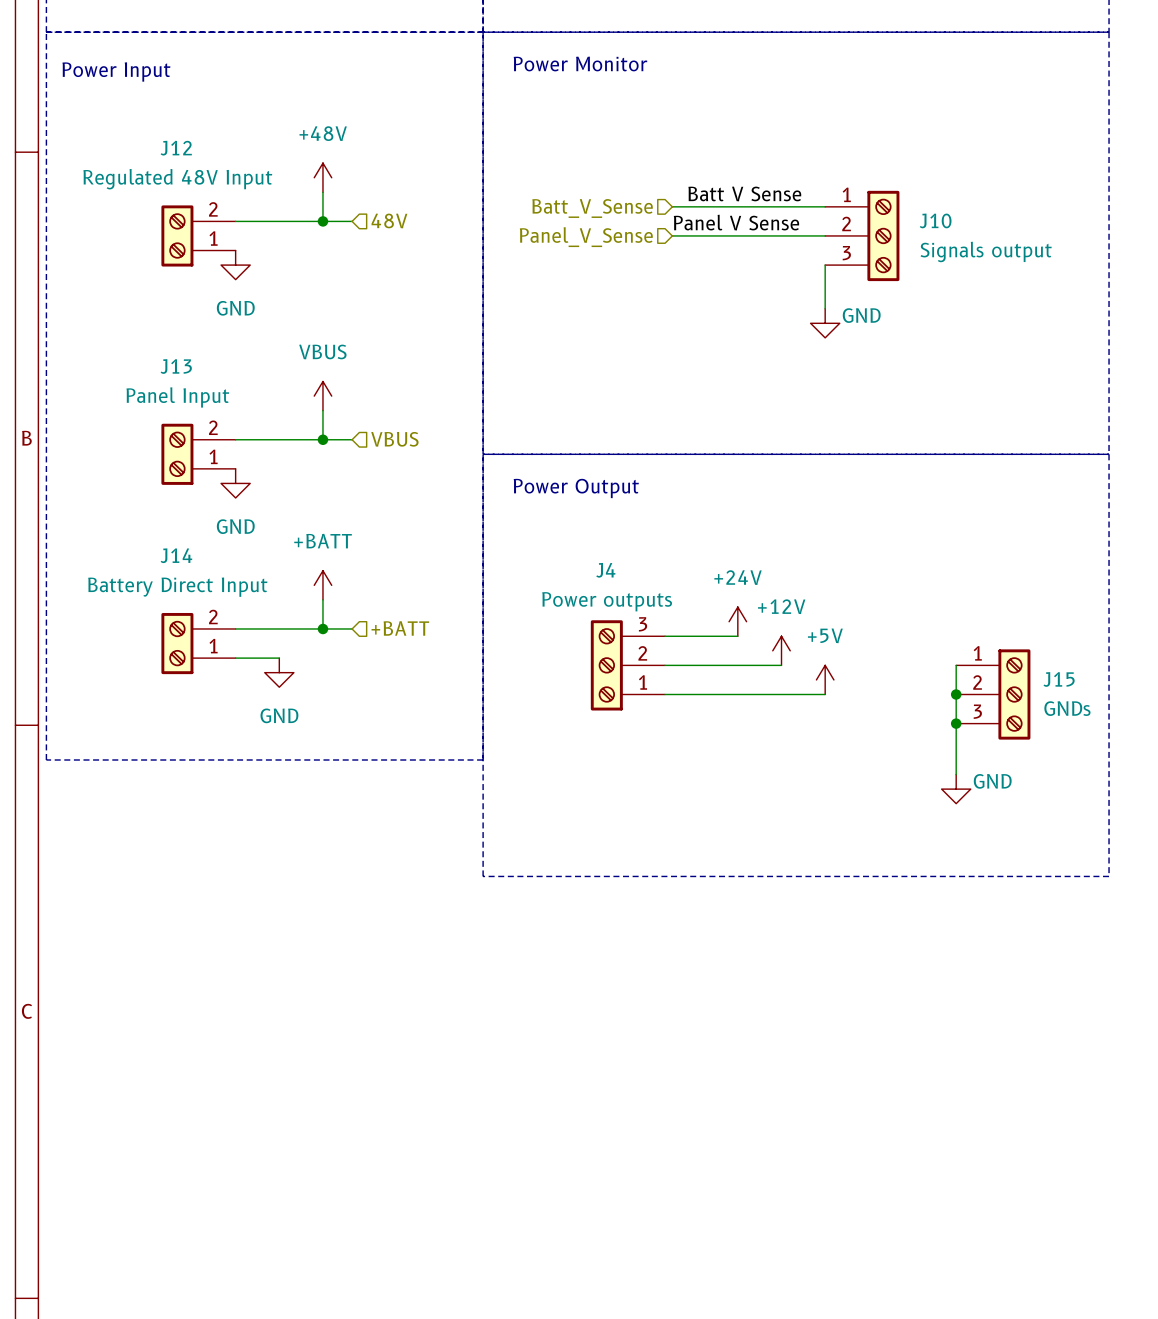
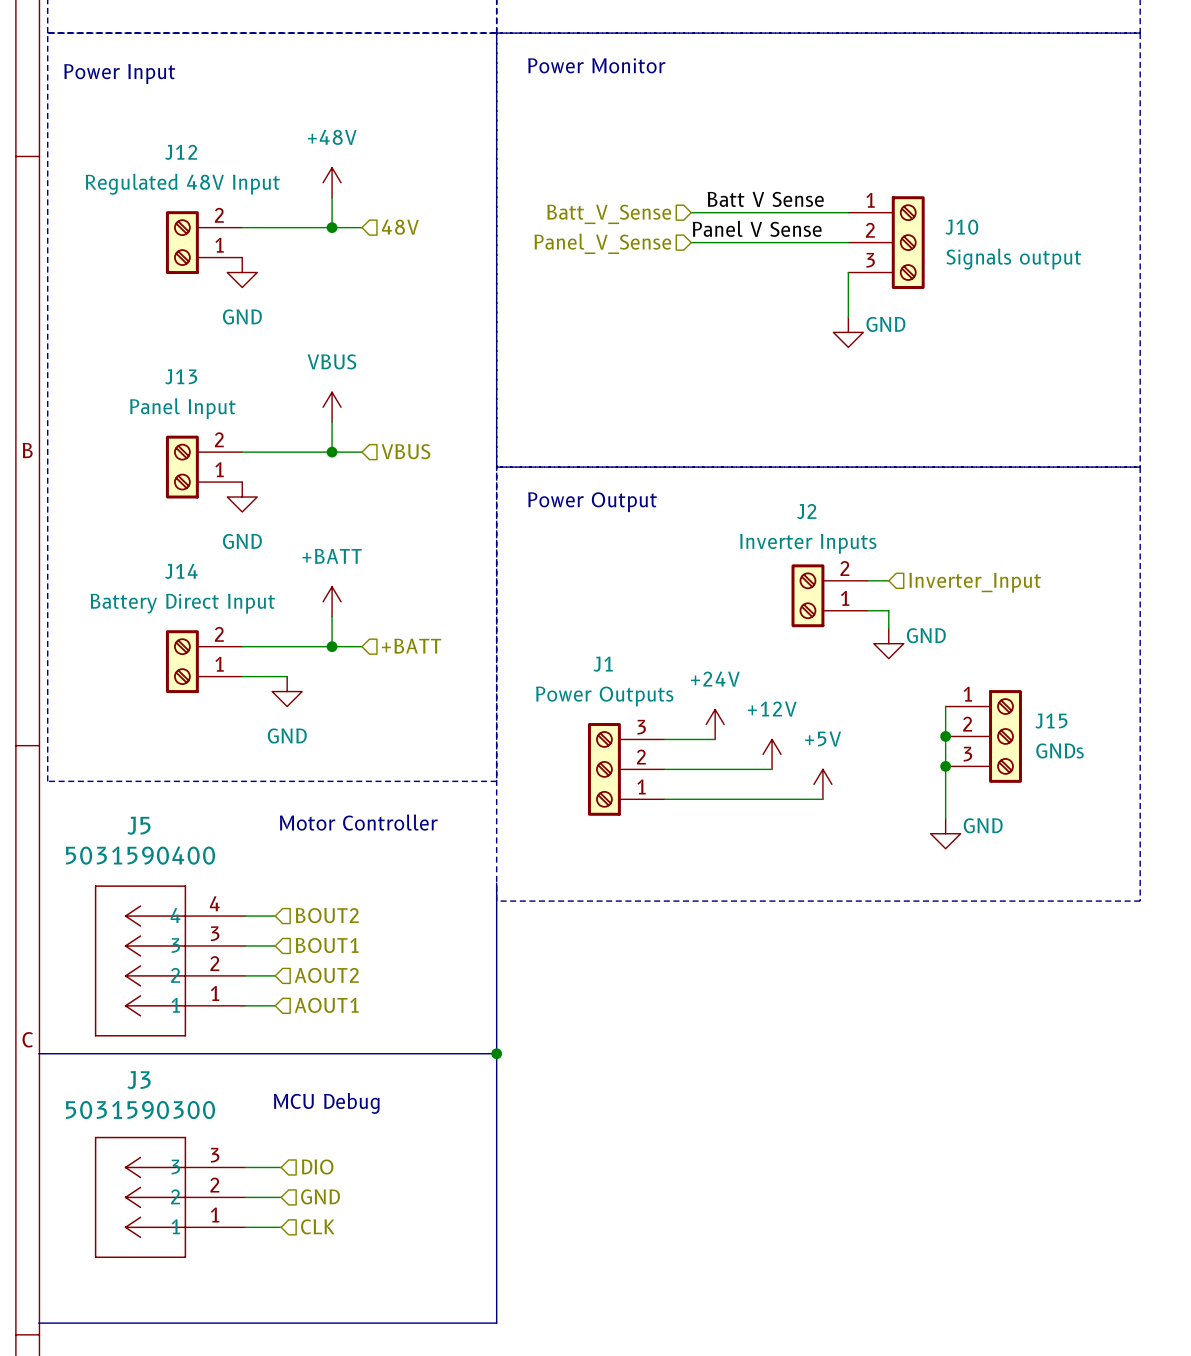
wire: none -> (867, 580) (888, 580)
hierarchical label: none -> Inverter_Input (975, 582)
J2: none -> Inverter Inputs (829, 595)
wire: none -> (867, 610) (888, 610) (888, 628)
power symbol position: +24V (737, 621) -> +24V (715, 724)
power symbol: none -> GND (888, 643)
wire: (665, 636) (737, 636) -> none
power symbol position: +12V (781, 650) -> +12V (772, 754)
J4: Power outputs (627, 665) -> none
wire: (665, 665) (781, 665) -> none
wire: (956, 665) (956, 774) -> (945, 706) (945, 818)
power symbol position: +5V (825, 679) -> +5V (822, 784)
wire: (665, 694) (825, 694) -> none
junction: (956, 694) -> none
J15 position: (993, 694) -> (983, 736)
junction: none -> (945, 736)
wire: none -> (664, 739) (715, 739)
junction: (956, 723) -> none
junction: none -> (945, 766)
J1: none -> Power Outputs (626, 769)
wire: none -> (664, 769) (772, 769)
wire: none -> (664, 799) (822, 799)
power symbol position: GND (956, 789) -> GND (945, 833)
text: none -> Motor Controller (358, 822)
bus: none -> (496, 883) (496, 1323) (38, 1323)
hierarchical label: none -> BOUT2 (327, 915)
wire: none -> (245, 916) (275, 916)
hierarchical label: none -> BOUT1 (327, 945)
wire: none -> (245, 945) (275, 945)
J5: none -> 5031590400 (170, 960)
hierarchical label: none -> AOUT2 (326, 975)
wire: none -> (245, 975) (275, 975)
hierarchical label: none -> AOUT1 (326, 1005)
wire: none -> (245, 1005) (275, 1005)
bus: none -> (38, 1053) (496, 1053)
junction: none -> (496, 1053)
text: none -> MCU Debug (326, 1103)
wire: none -> (245, 1167) (281, 1167)
hierarchical label: none -> DIO (317, 1166)
J3: none -> 5031590300 (170, 1197)
wire: none -> (245, 1197) (281, 1197)
hierarchical label: none -> GND (320, 1196)
wire: none -> (245, 1227) (281, 1227)
hierarchical label: none -> CLK (317, 1226)

